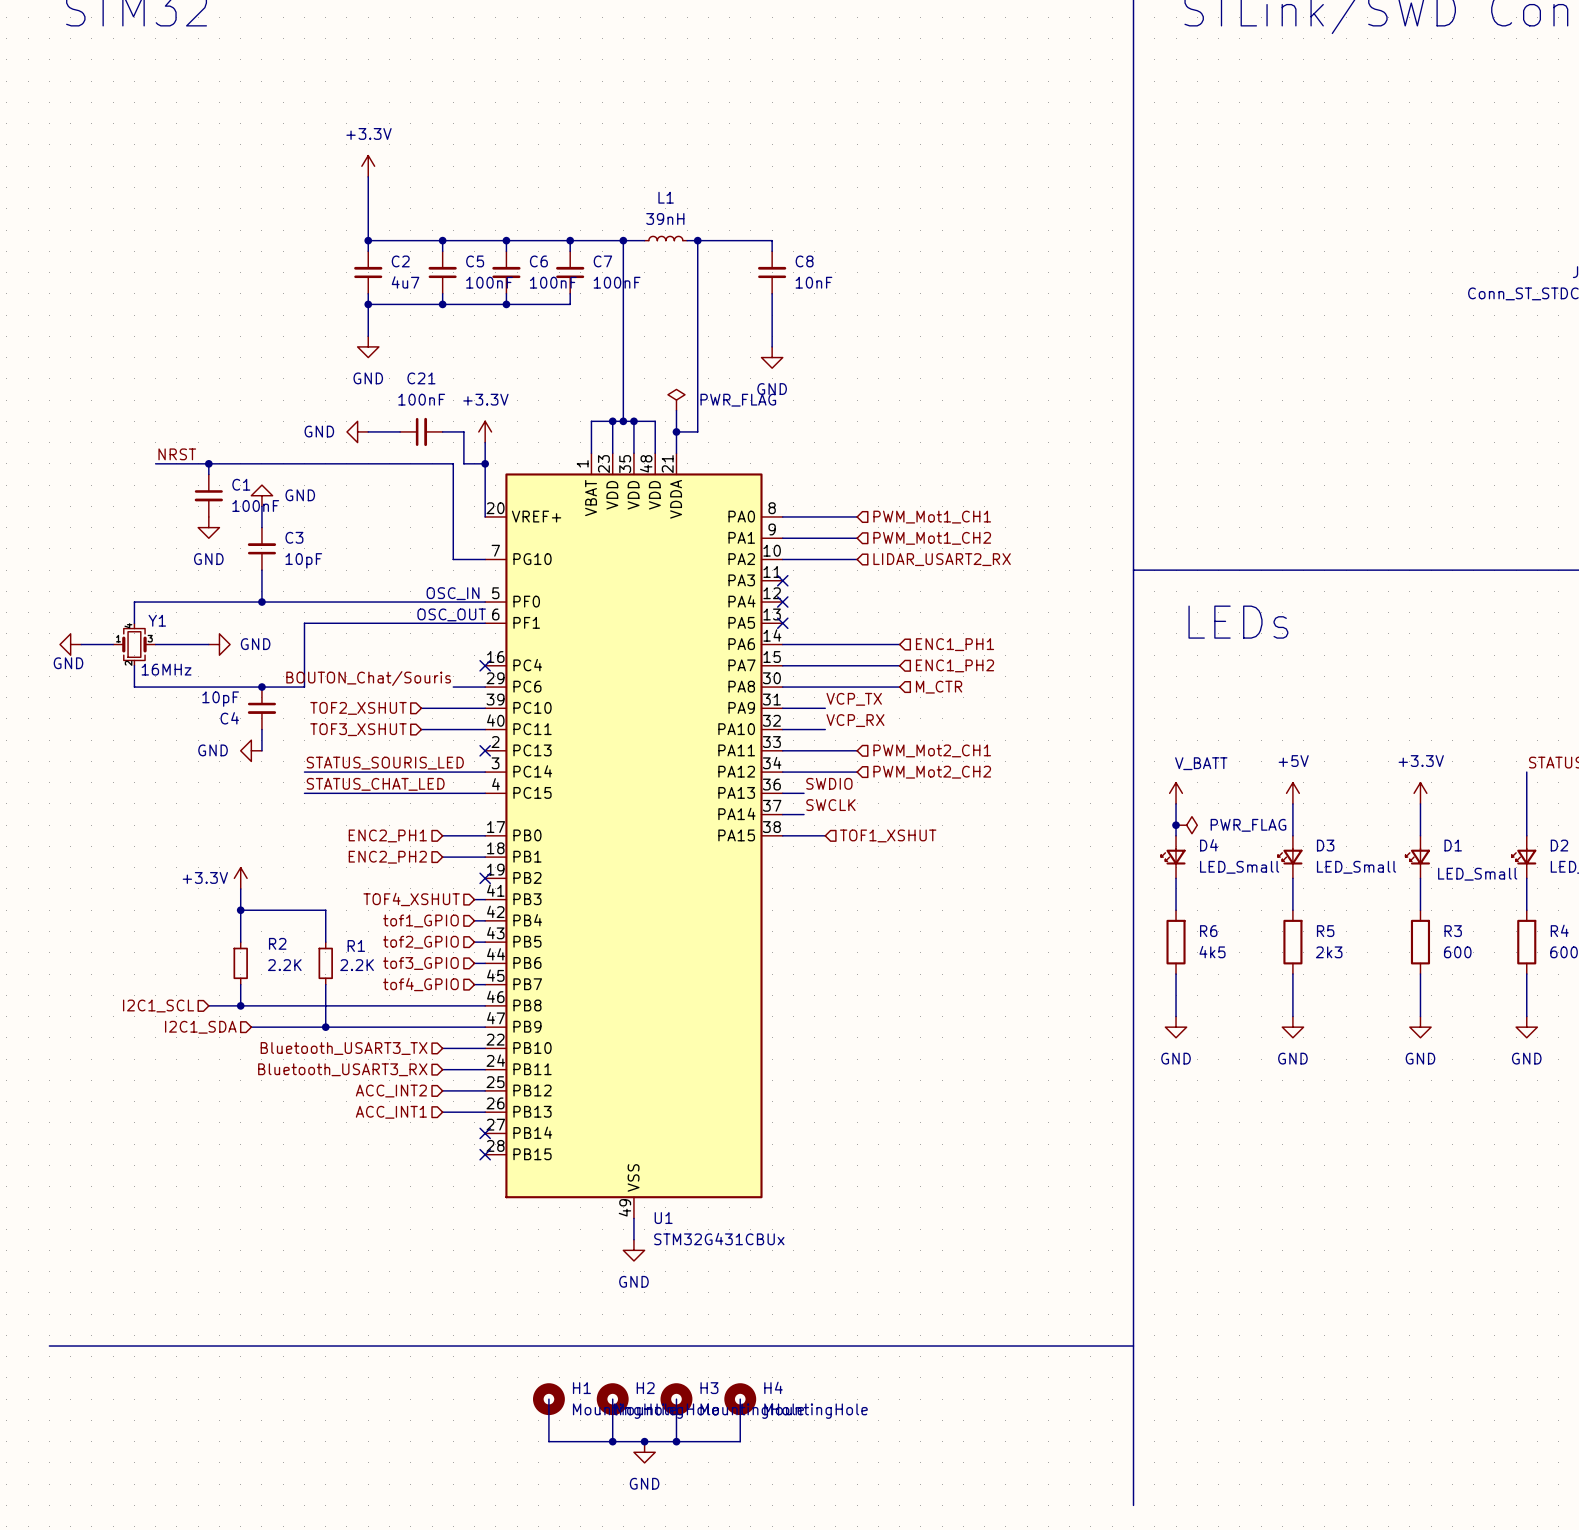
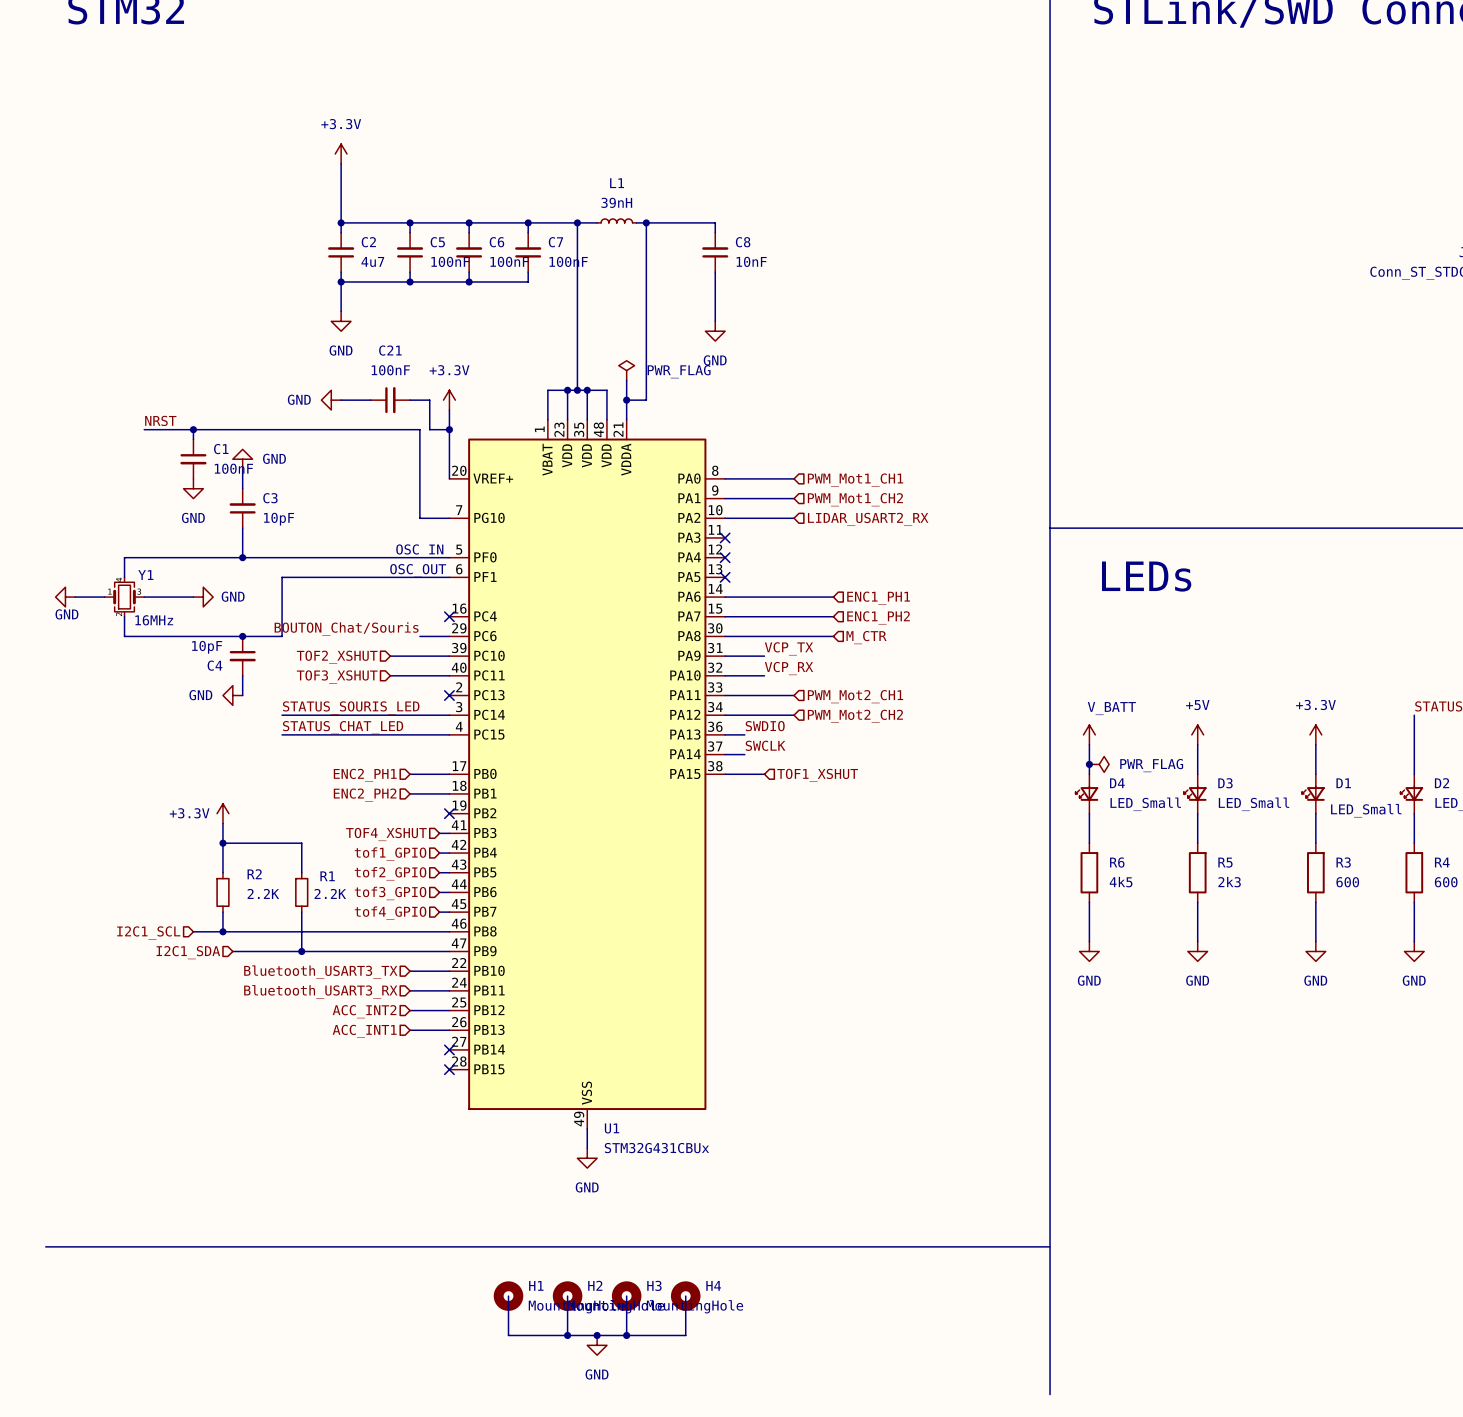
H4 value: MountingHole (815, 1411) -> none

